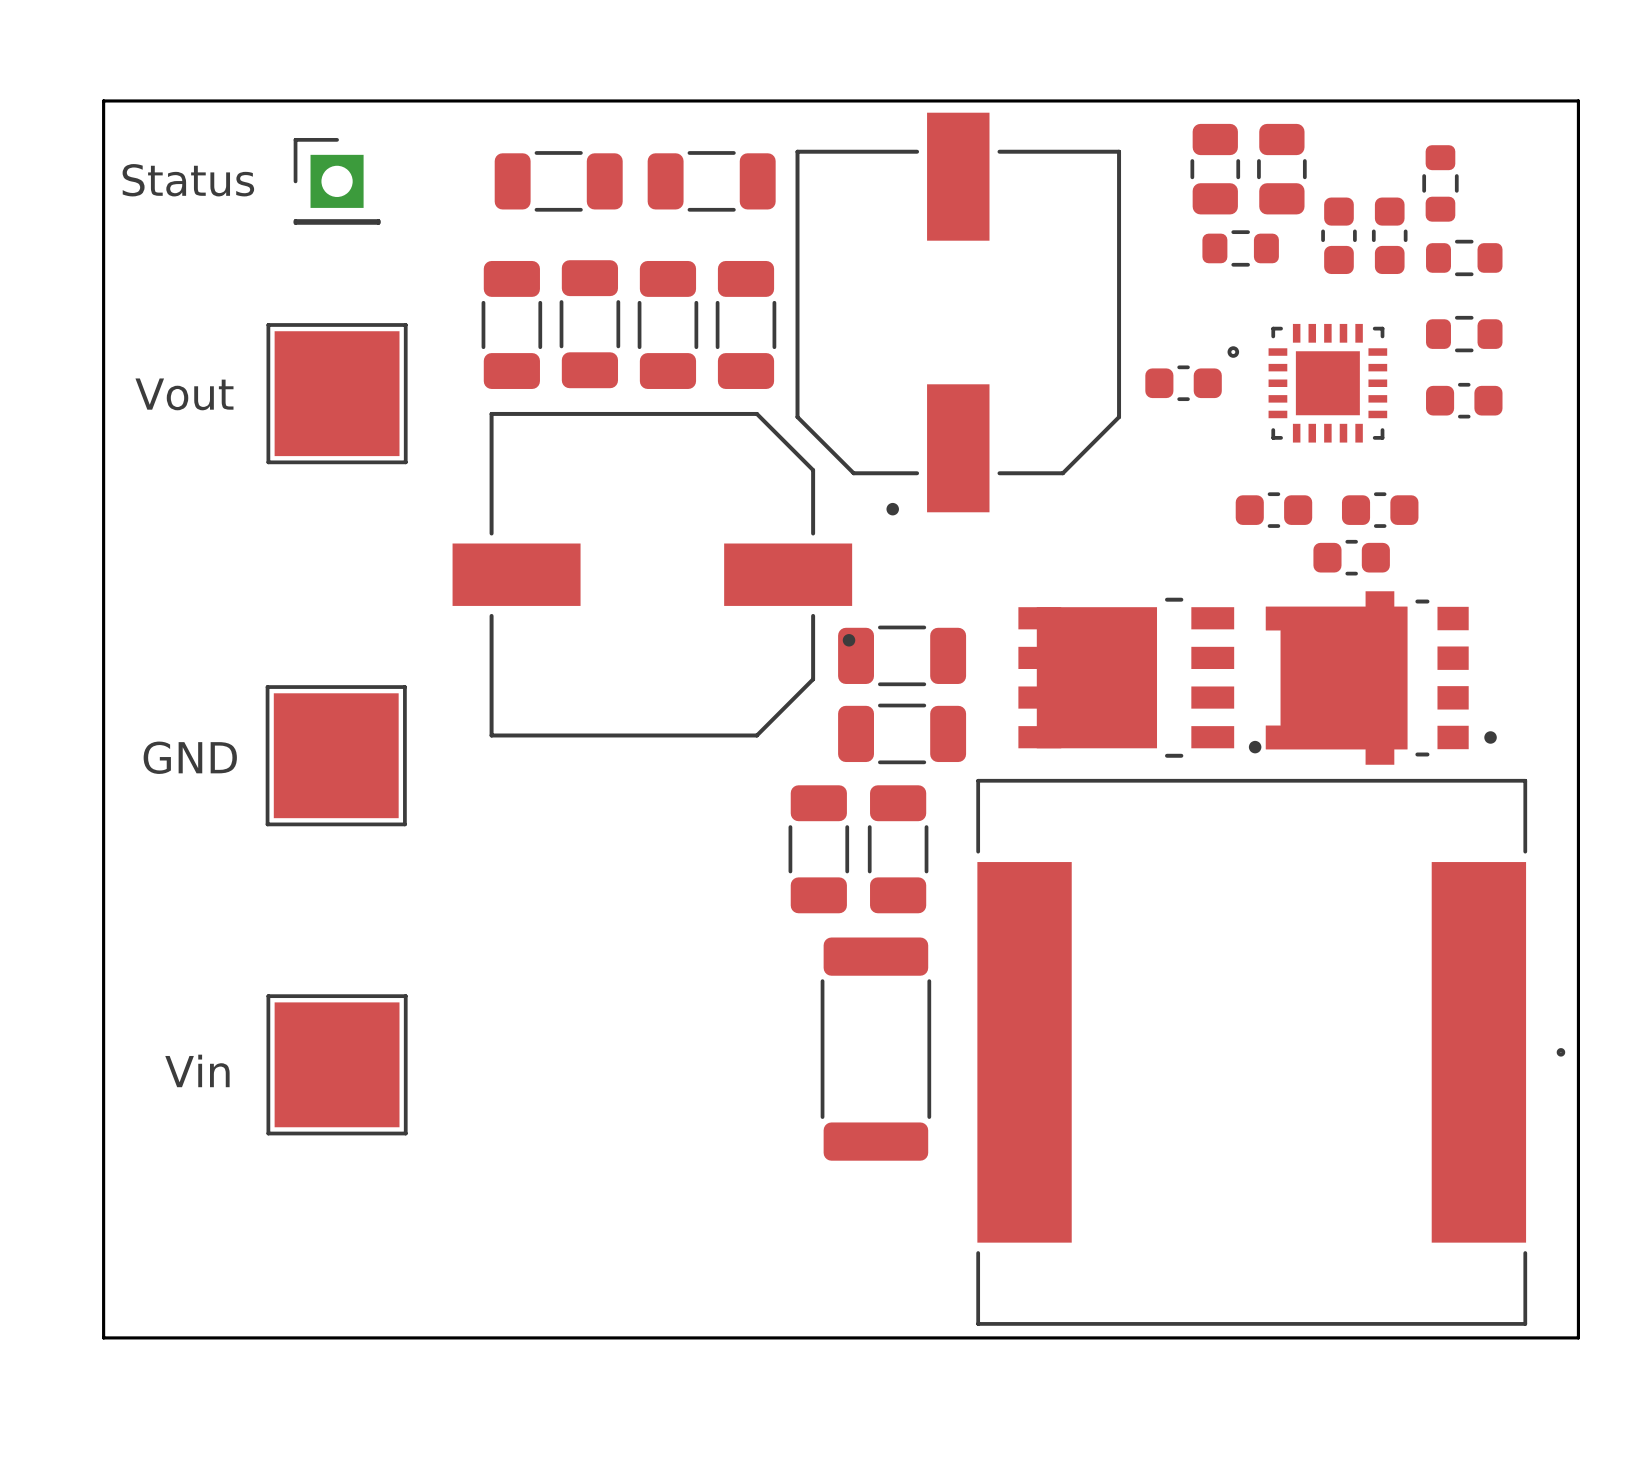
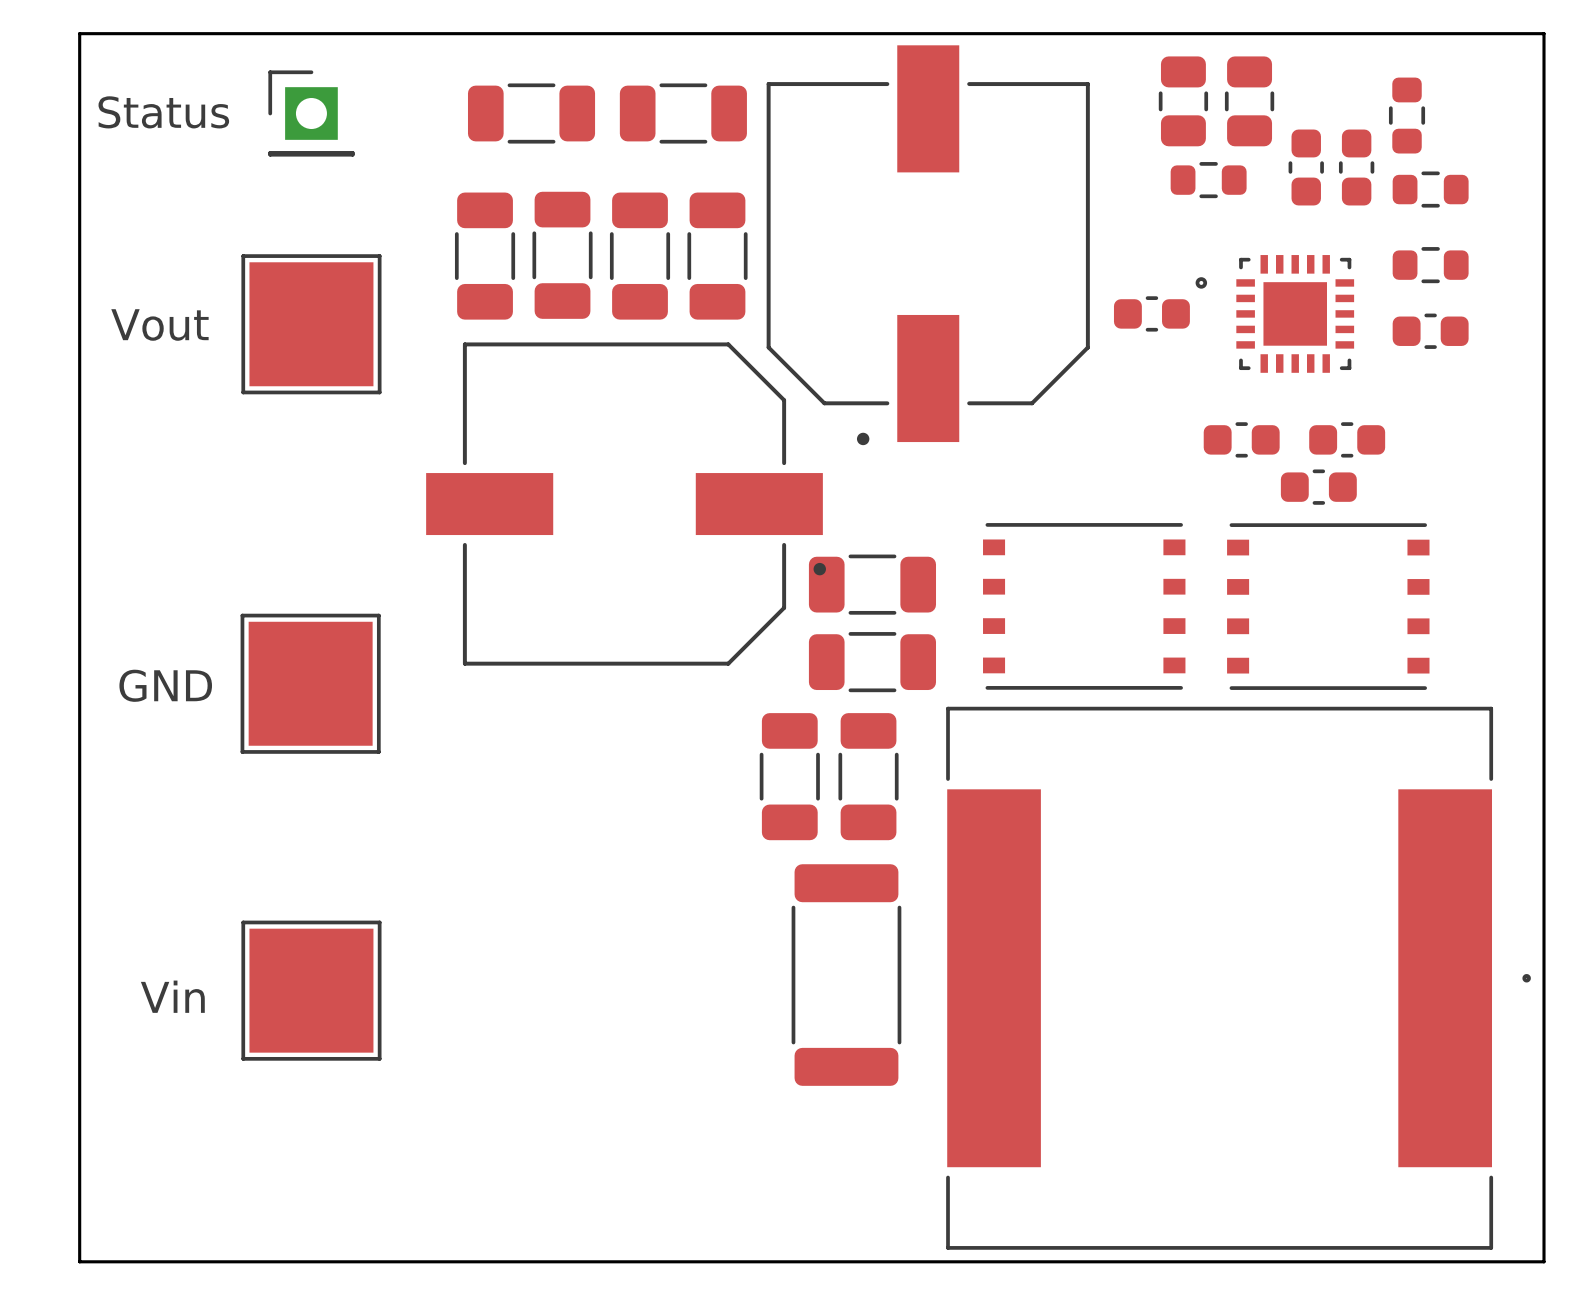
part footprint: [1265, 591, 1497, 765] -> [1227, 523, 1430, 690]
part footprint: [1018, 597, 1262, 758] -> [983, 523, 1186, 690]

